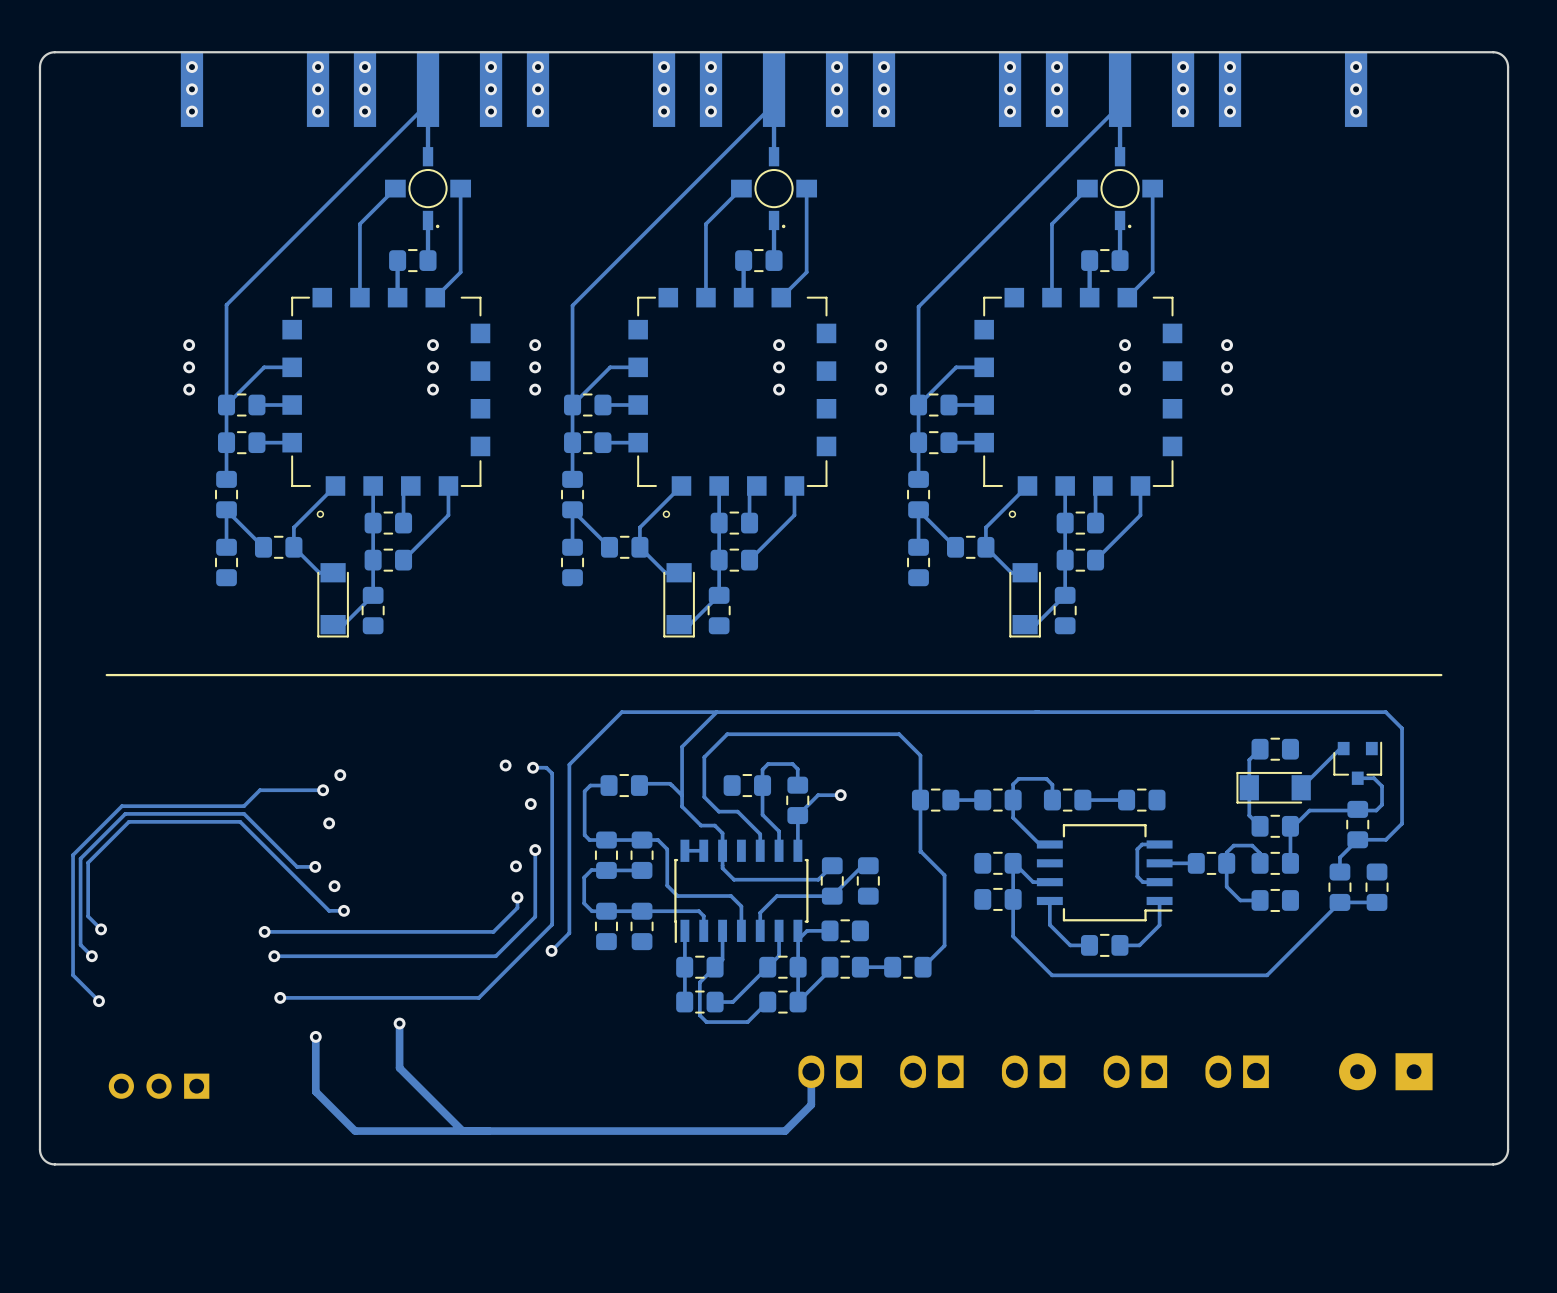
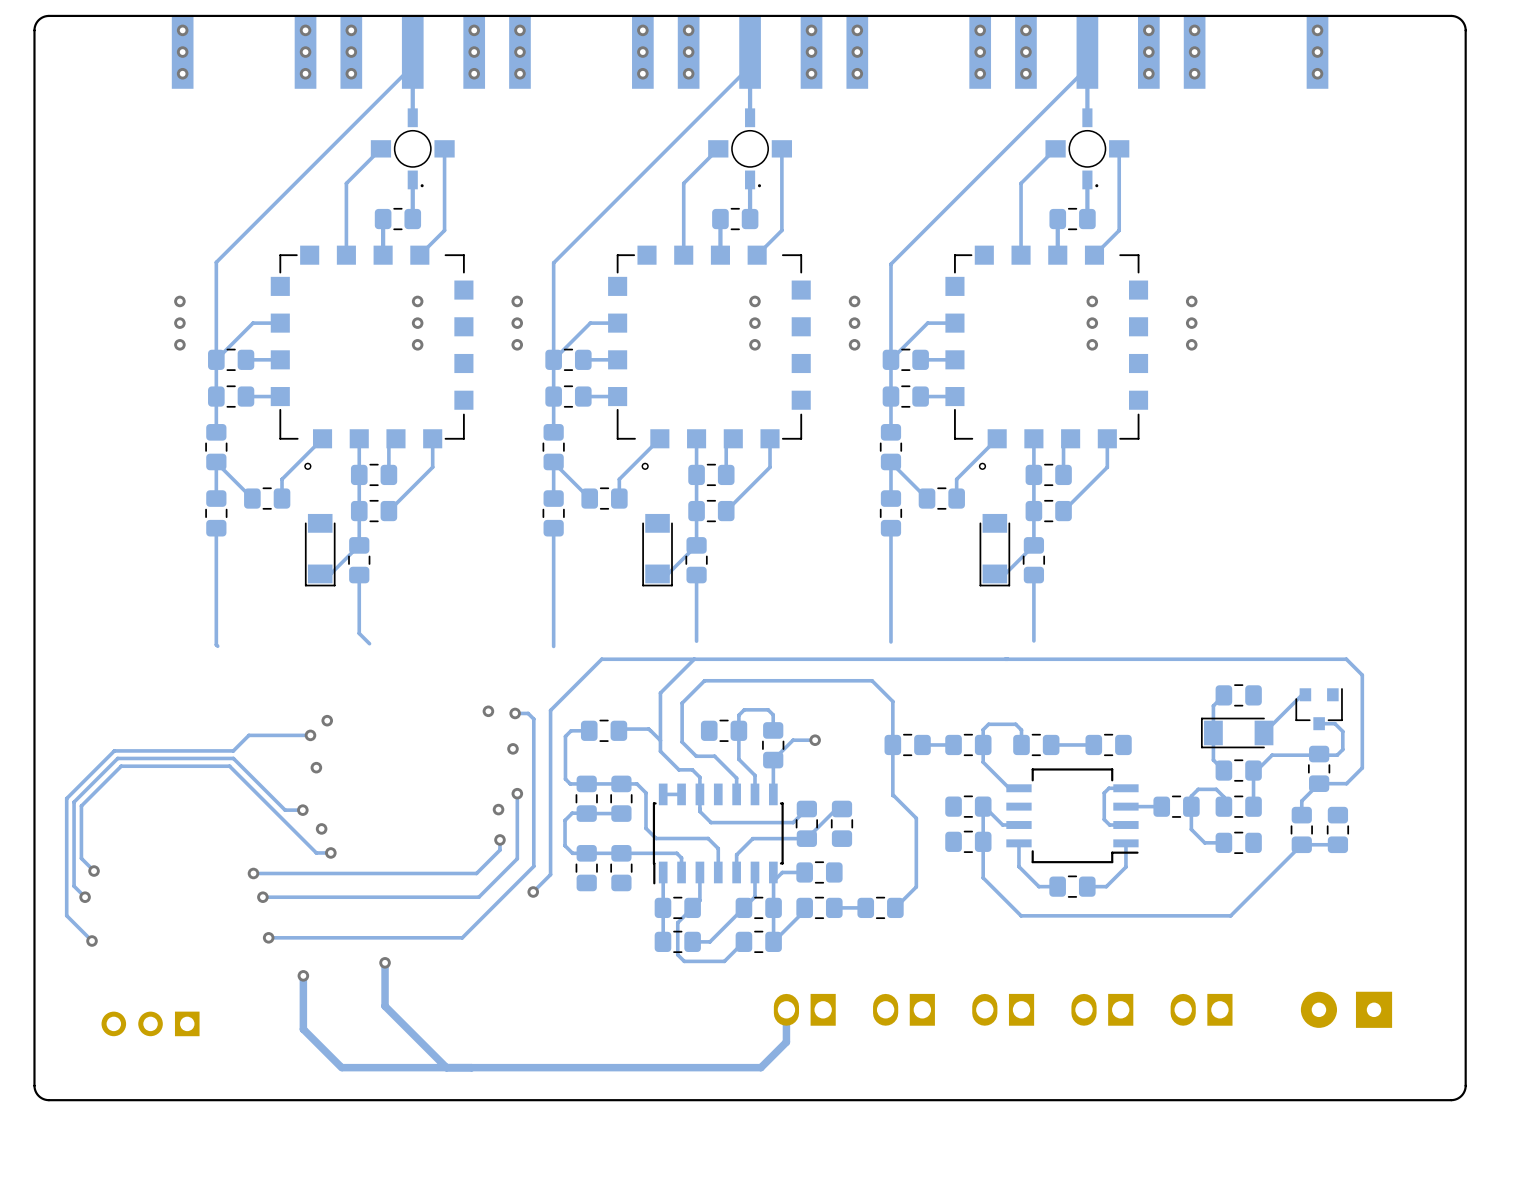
track: (293, 547) (319, 572) (333, 572) -> none
track: (639, 547) (665, 572) (679, 572) -> none
track: (985, 547) (1011, 572) (1025, 572) -> none
track: none -> (216, 528) (217, 646)
track: none -> (553, 528) (553, 646)
track: none -> (890, 528) (890, 641)
track: none -> (359, 575) (359, 633) (369, 643)
track: none -> (696, 575) (696, 641)
track: none -> (1033, 575) (1033, 640)
line: (1441, 675) (106, 675) -> none

